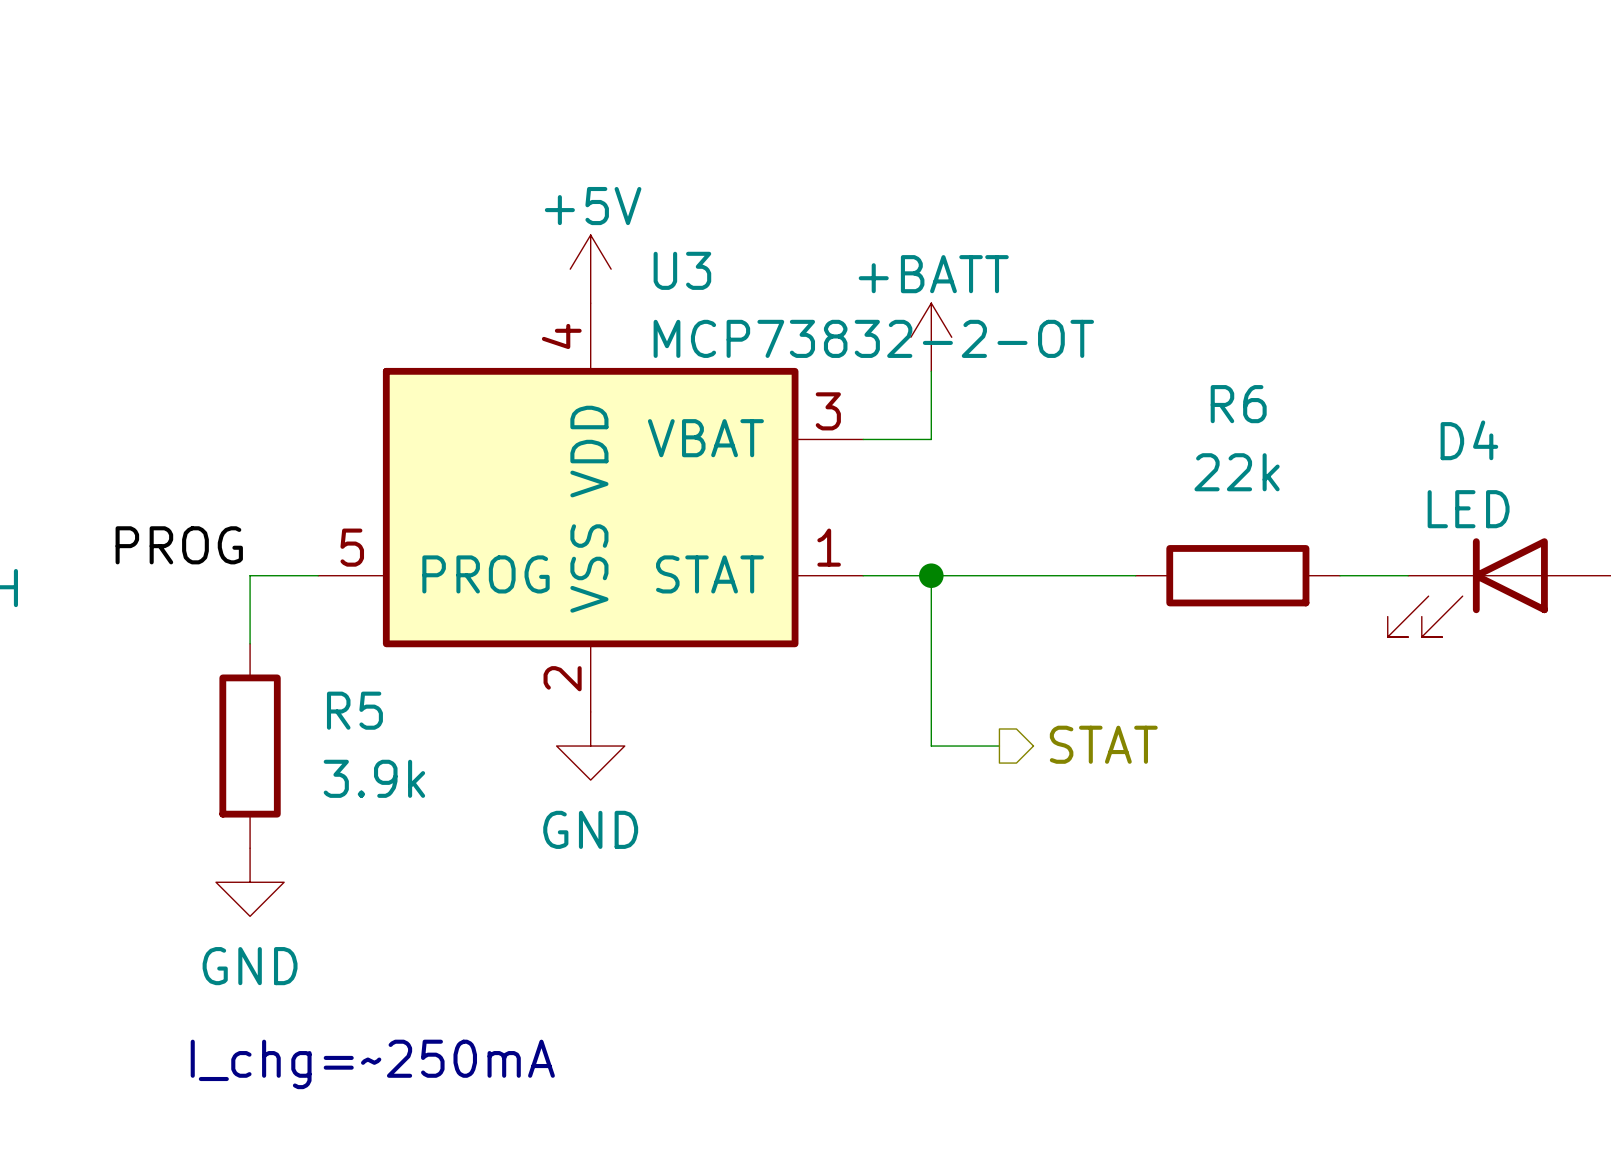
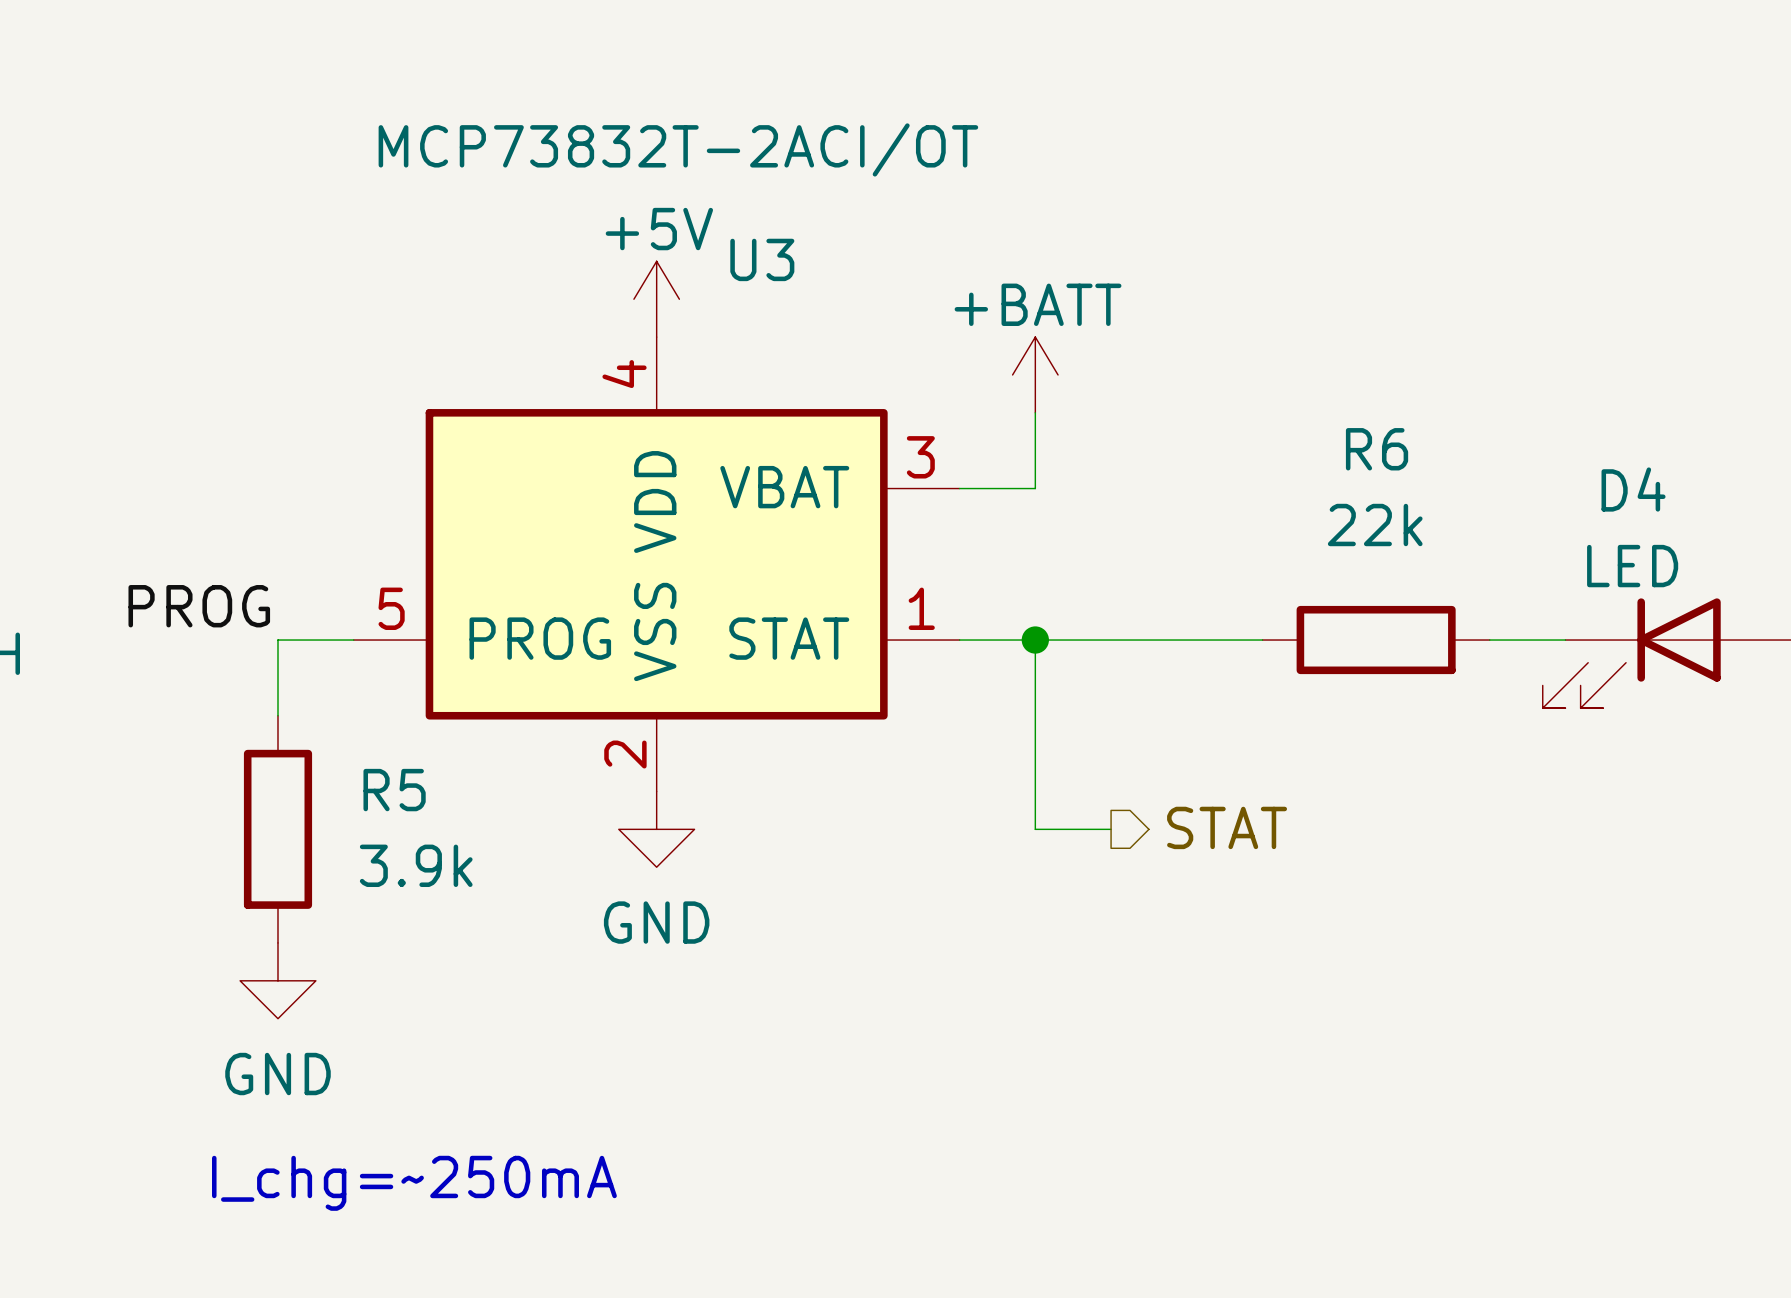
U3 name position: U3 (682, 270) -> U3 (762, 259)
U3 value: MCP73832-2-OT (873, 338) -> MCP73832T-2ACI/OT (678, 149)

